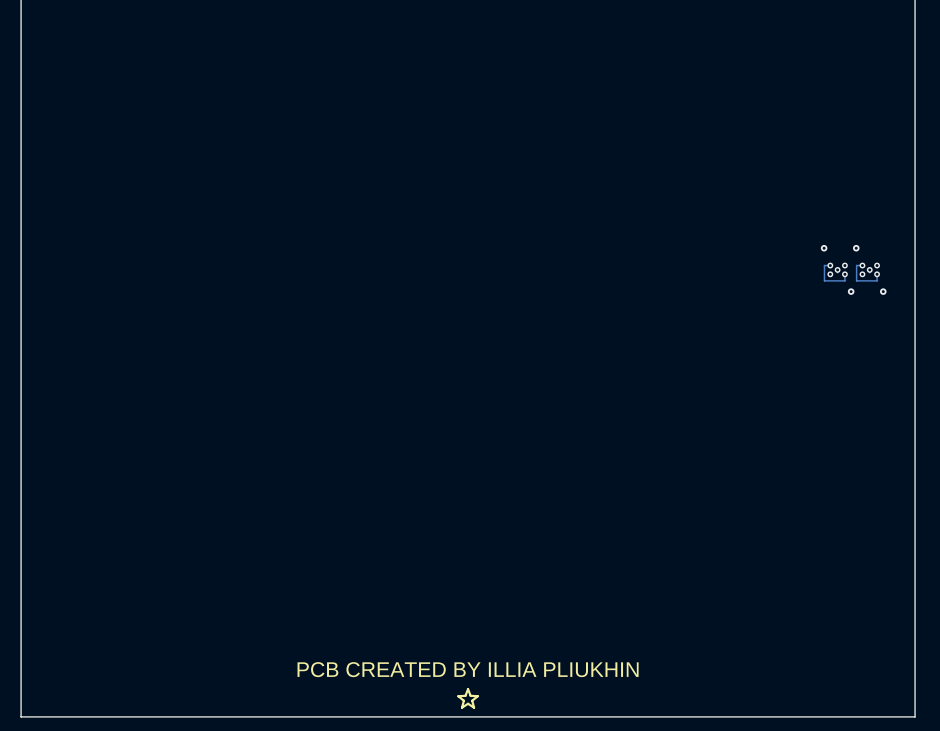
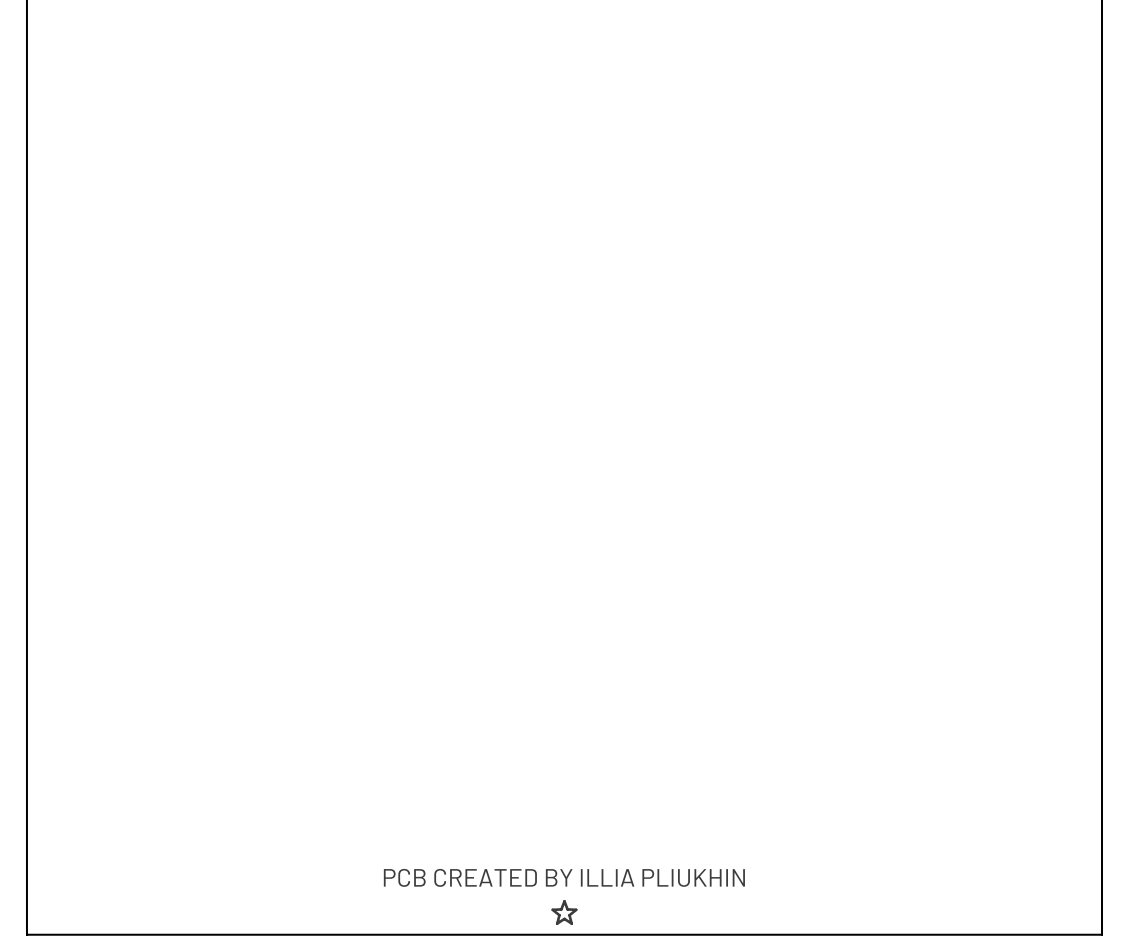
via: (824, 248) -> none
via: (856, 248) -> none
track: (830, 265) (824, 265) (824, 280) (844, 280) (844, 274) -> none
via: (830, 265) -> none
via: (844, 265) -> none
track: (862, 265) (856, 265) (856, 280) (877, 280) (877, 274) -> none
via: (862, 265) -> none
via: (877, 265) -> none
via: (837, 269) -> none
via: (869, 269) -> none
via: (830, 274) -> none
via: (844, 274) -> none
via: (862, 274) -> none
via: (877, 274) -> none
via: (851, 291) -> none
via: (883, 291) -> none

